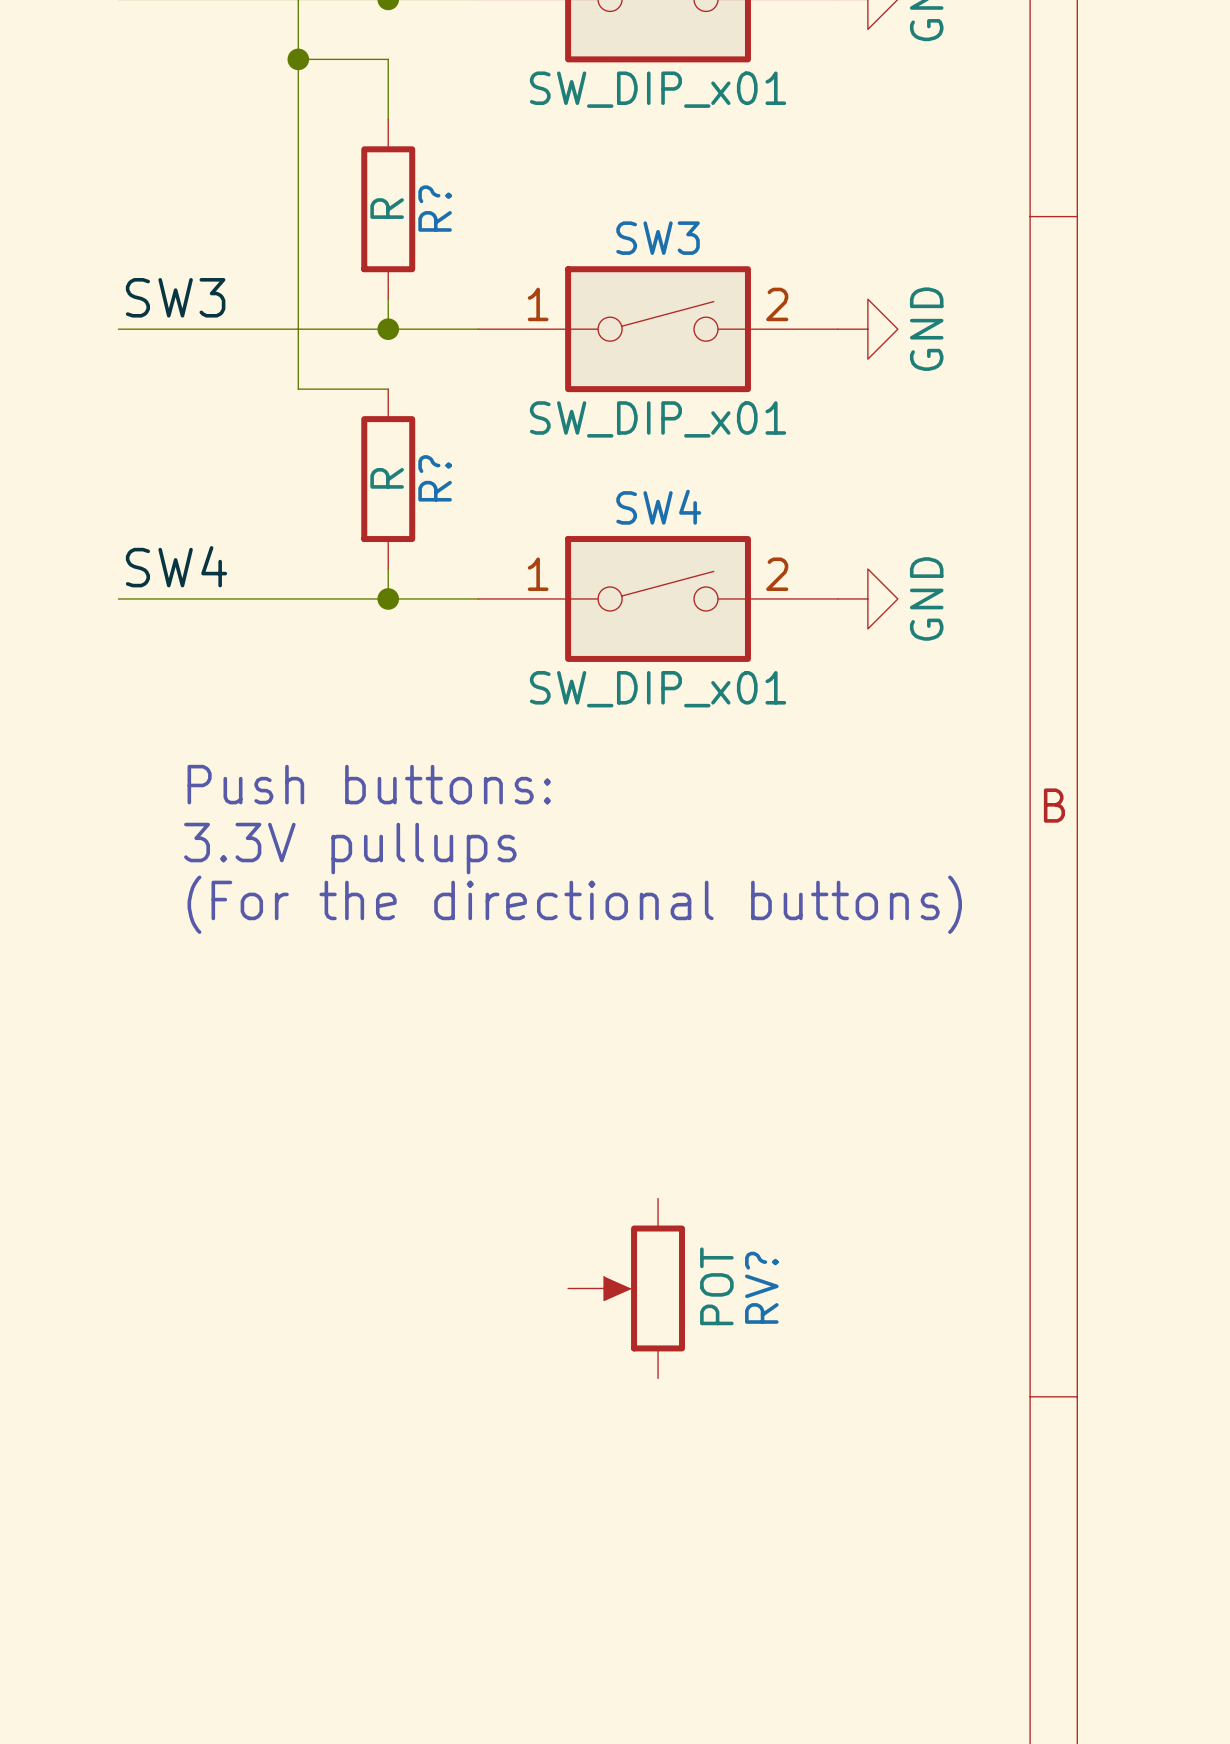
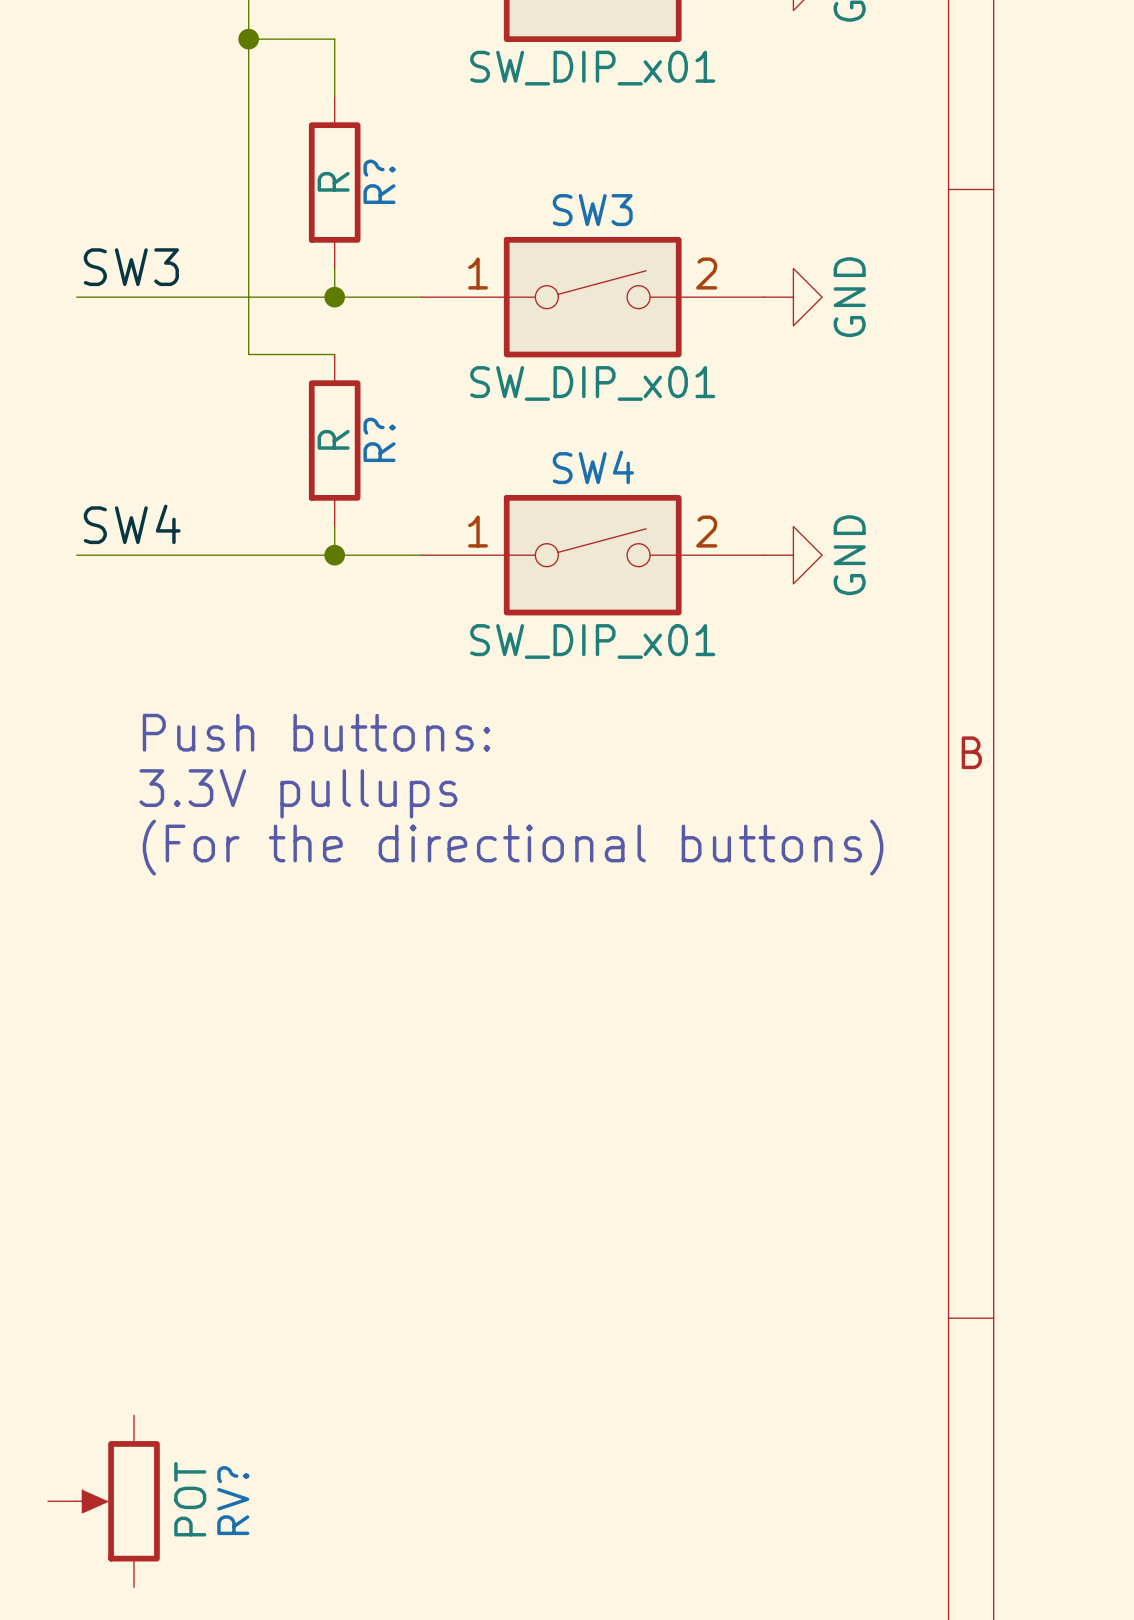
RV? position: (626, 1288) -> (103, 1501)

